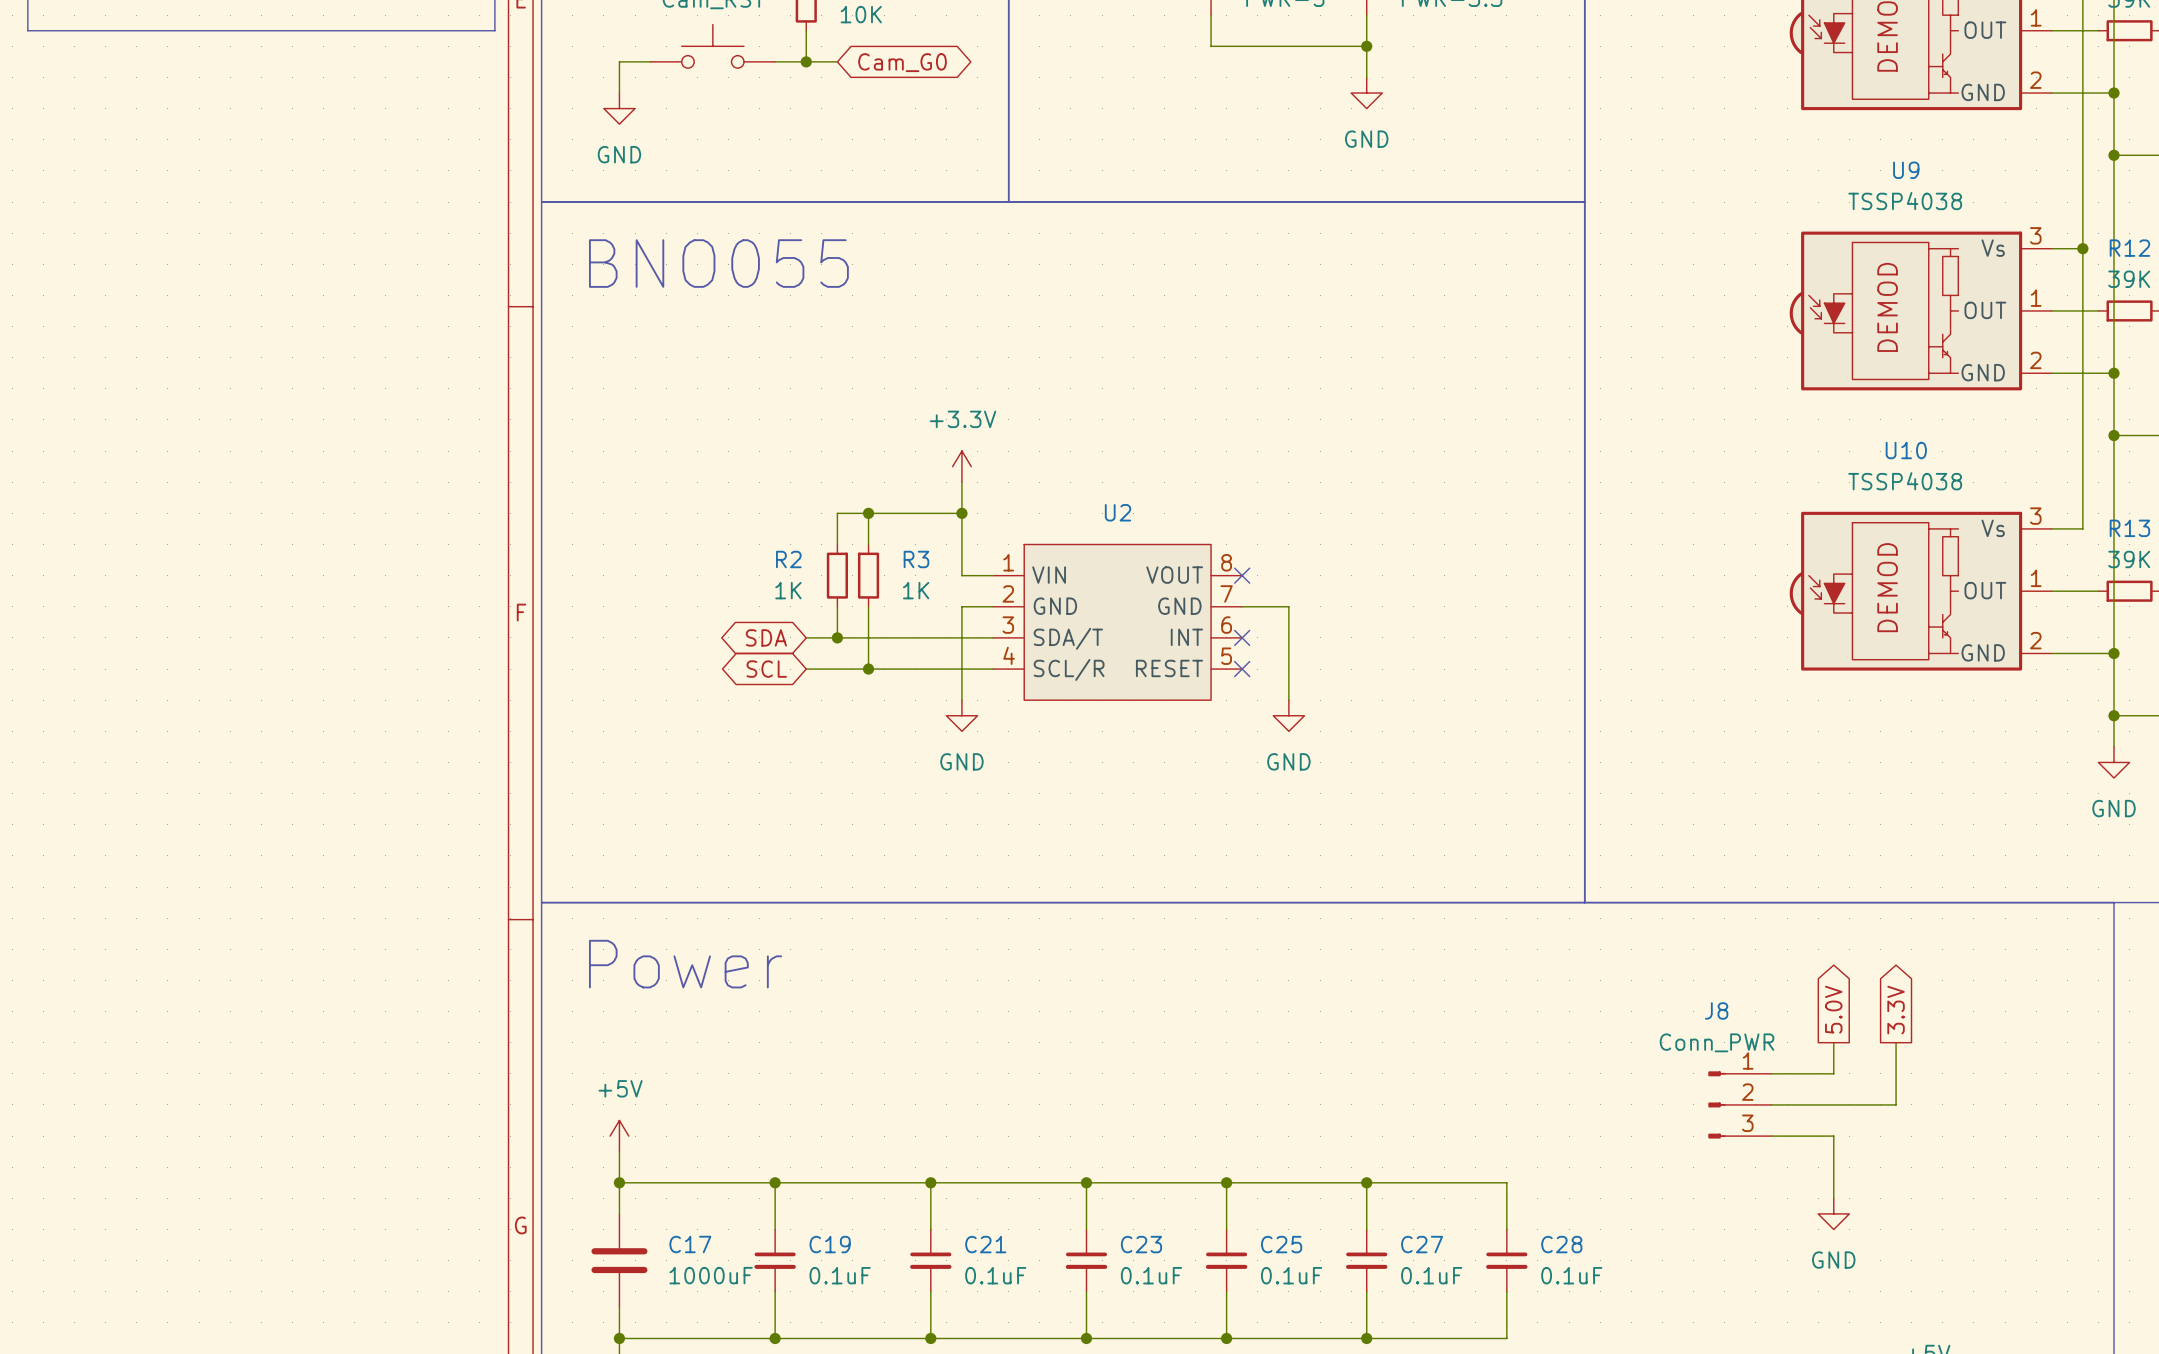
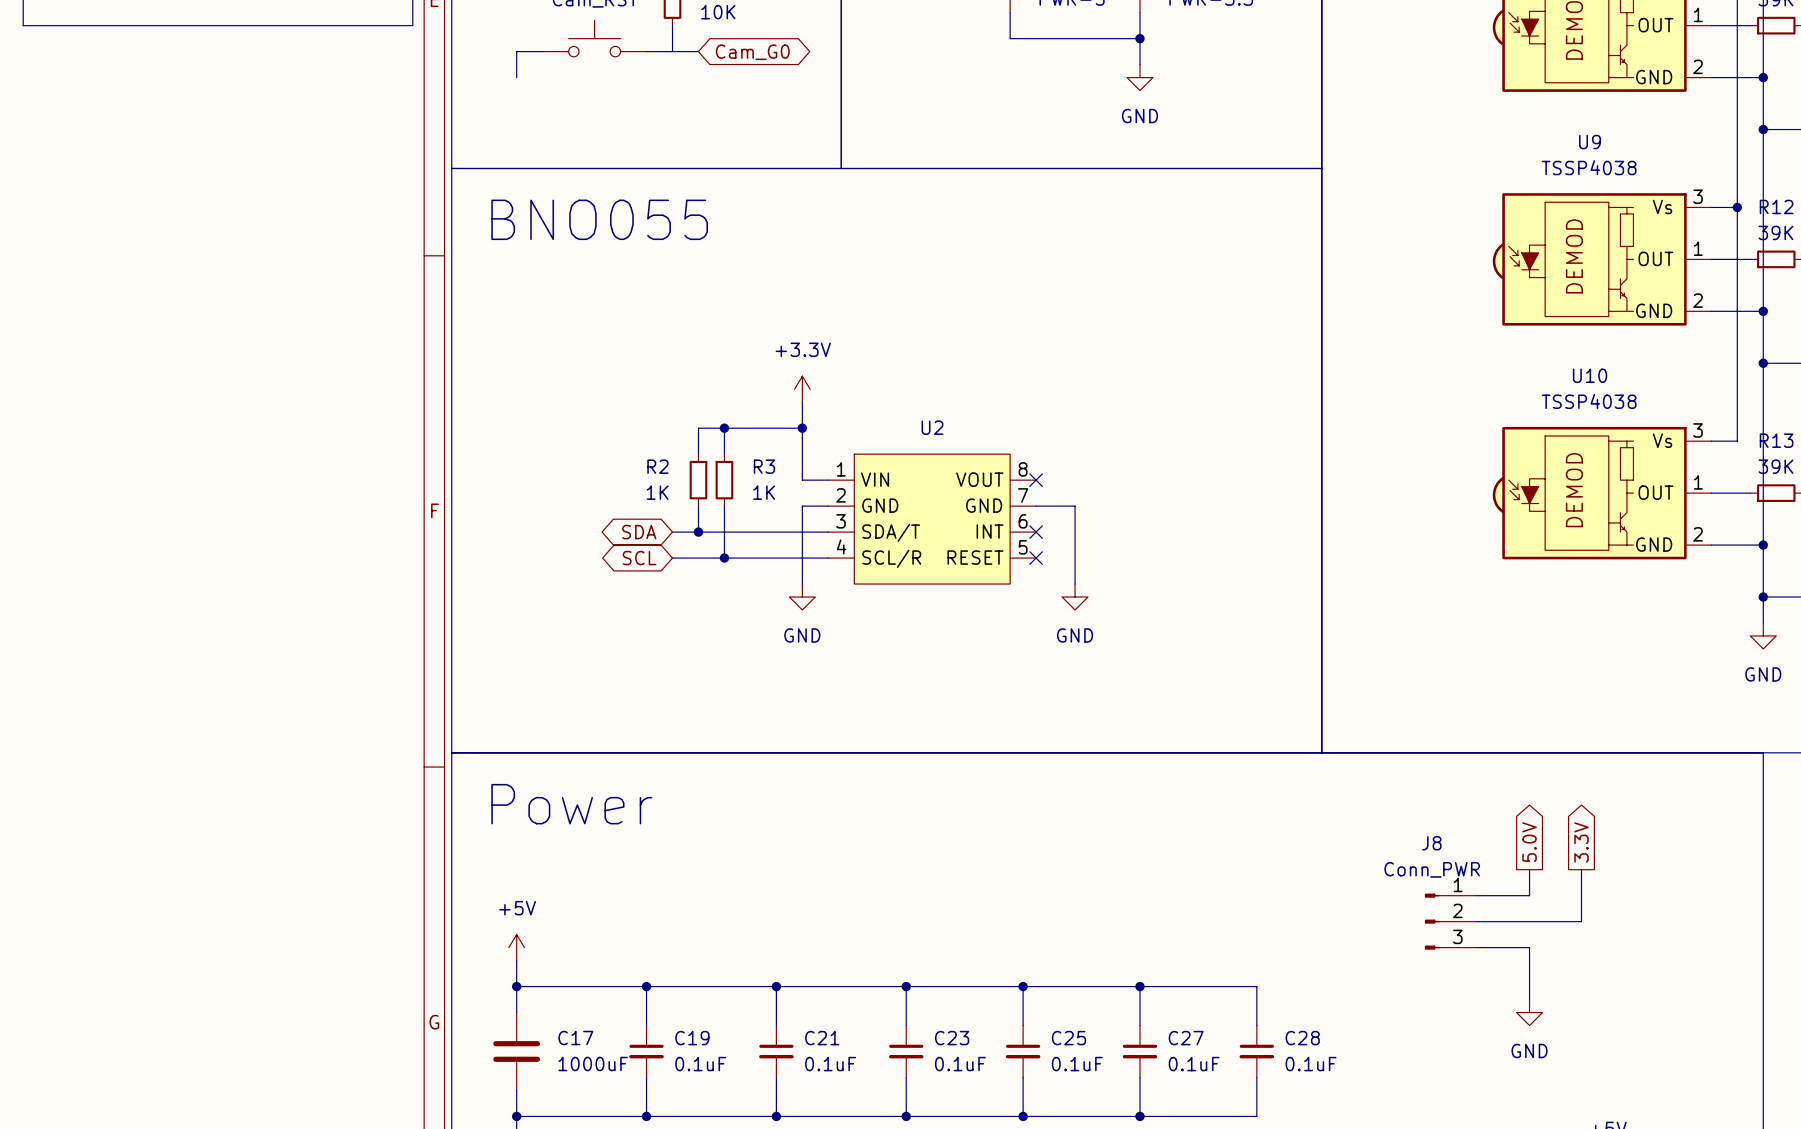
junction: (806, 61) -> none
power symbol: GND (619, 108) -> none

